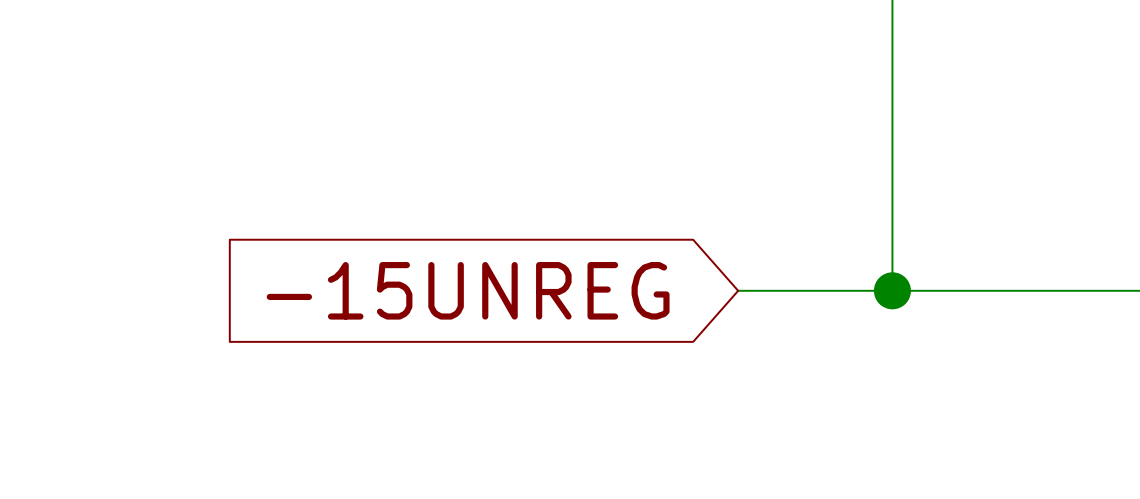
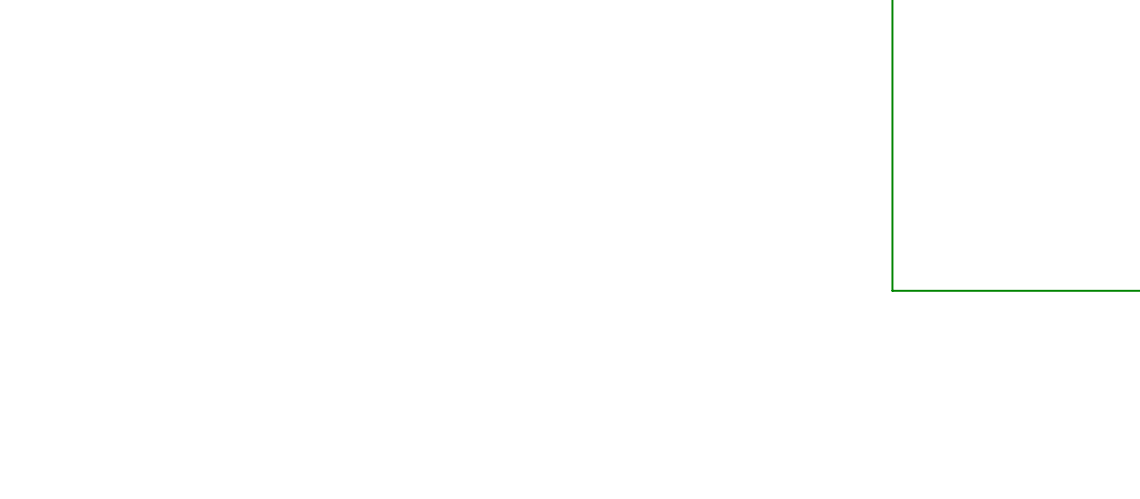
global label: -15UNREG (468, 290) -> none
wire: (738, 290) (892, 290) -> none
junction: (892, 290) -> none

